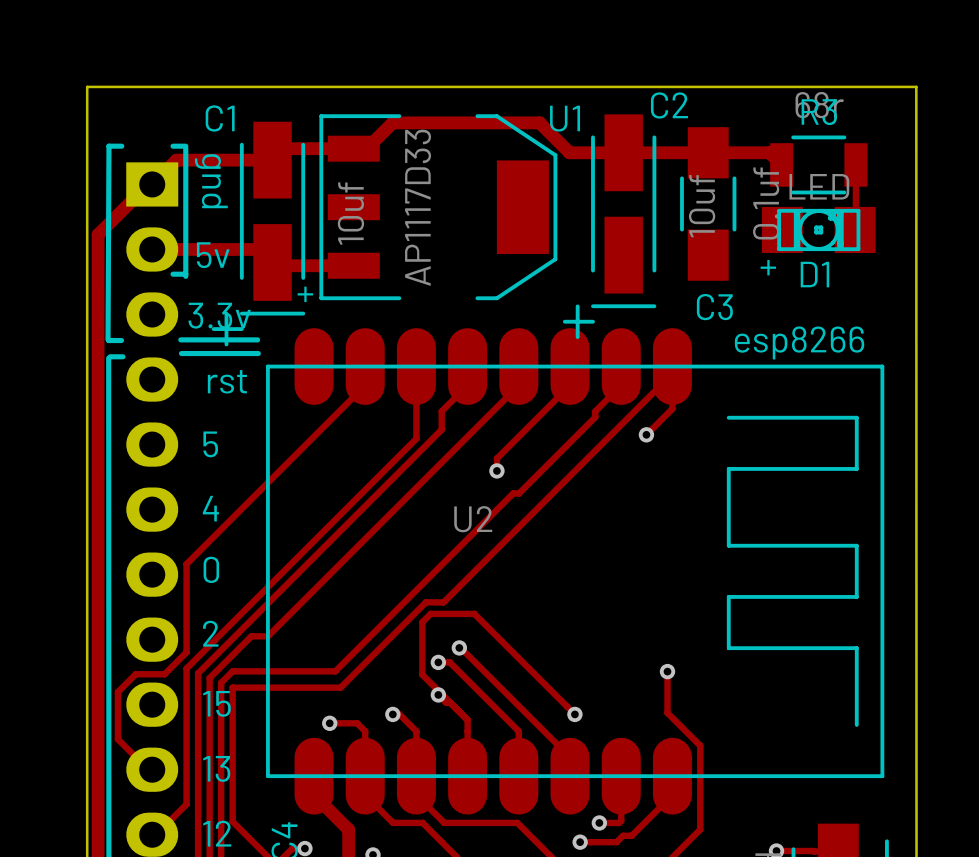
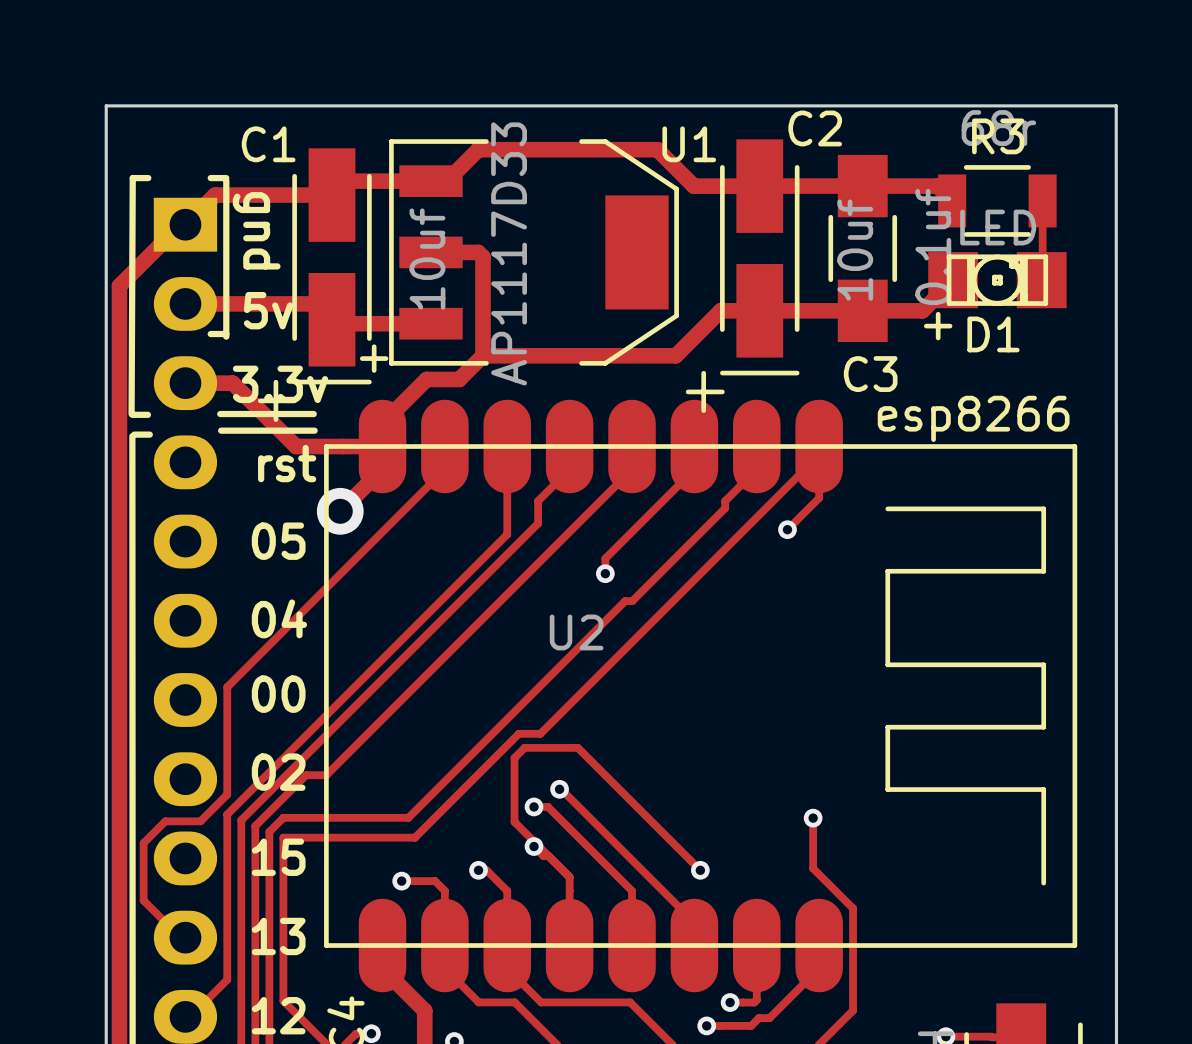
track: none -> (431, 252) (478, 252) (482, 257) (482, 355)
track: none -> (953, 280) (922, 310) (720, 310) (675, 355) (482, 355)
track: none -> (482, 355) (459, 379) (426, 379) (382, 423) (382, 469) (340, 511)
track: none -> (185, 383) (232, 383) (296, 446) (382, 446)
via: none -> (340, 511)
text: 5 (210, 444) -> 05 (278, 541)
text: 4 (210, 508) -> 04 (279, 618)
text: 0 (211, 569) -> 00 (278, 694)
text: 2 (210, 633) -> 02 (278, 772)

